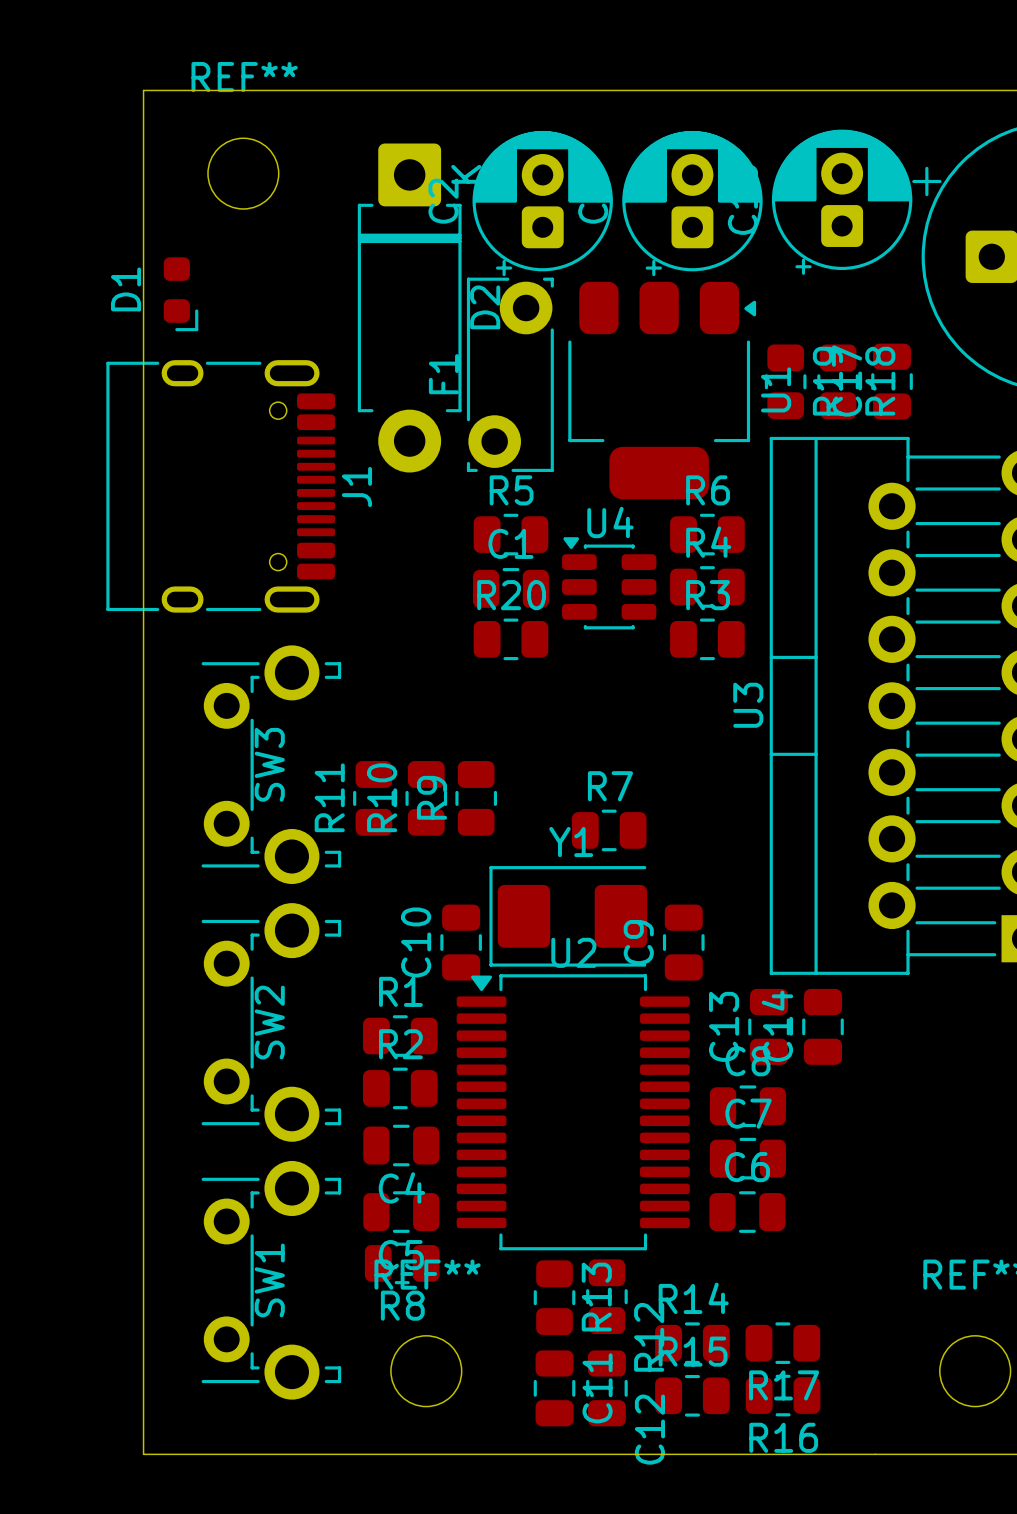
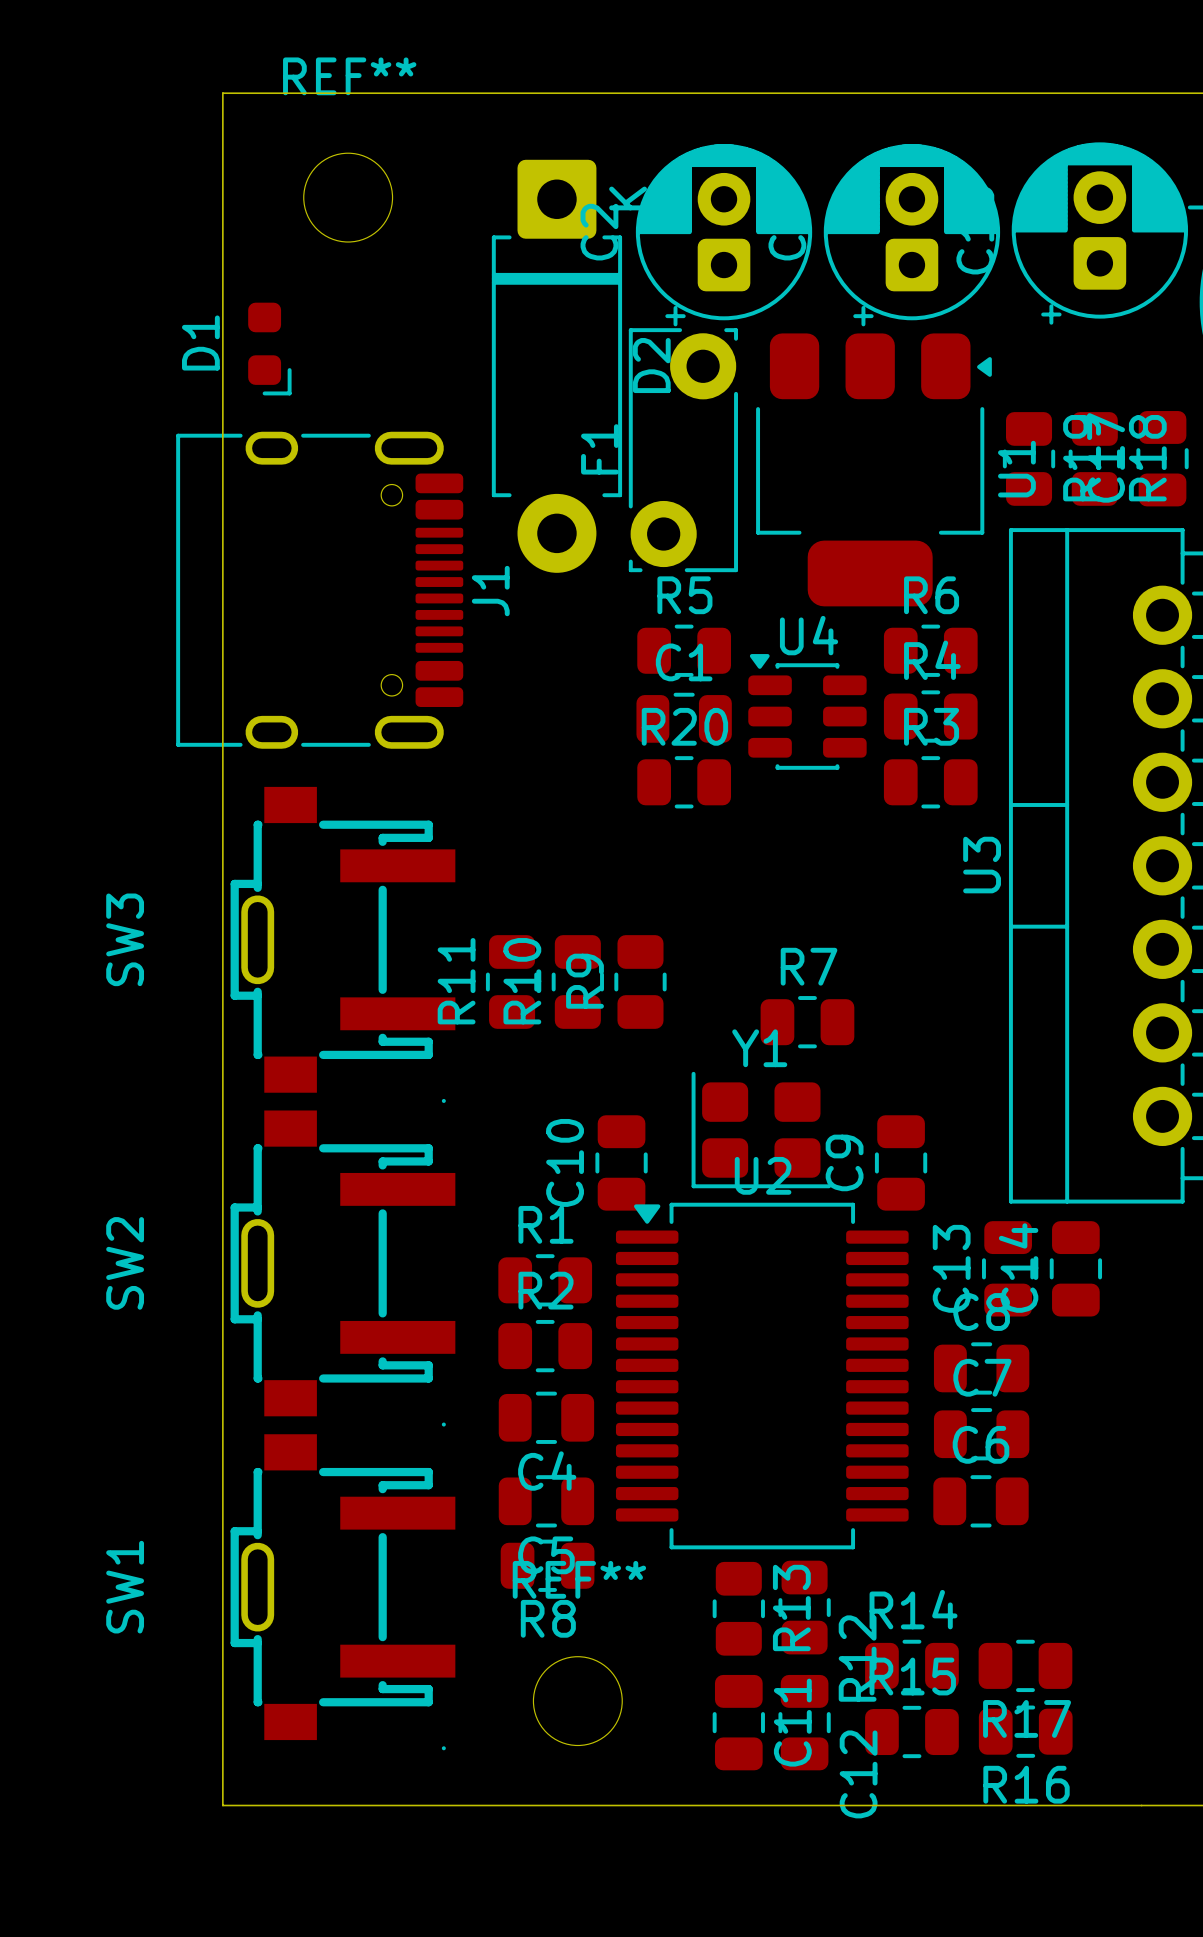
SW3 footprint: [201, 645, 342, 884] -> [230, 786, 456, 1103]
SW3 name position: SW3 (269, 764) -> SW3 (125, 939)
Y1 footprint: [489, 866, 648, 967] -> [691, 1071, 832, 1189]
SW2 footprint: [201, 903, 342, 1142] -> [230, 1110, 456, 1427]
SW2 name position: SW2 (269, 1022) -> SW2 (125, 1263)
SW1 footprint: [201, 1160, 342, 1400] -> [230, 1434, 456, 1751]
SW1 name position: SW1 (269, 1280) -> SW1 (125, 1587)

